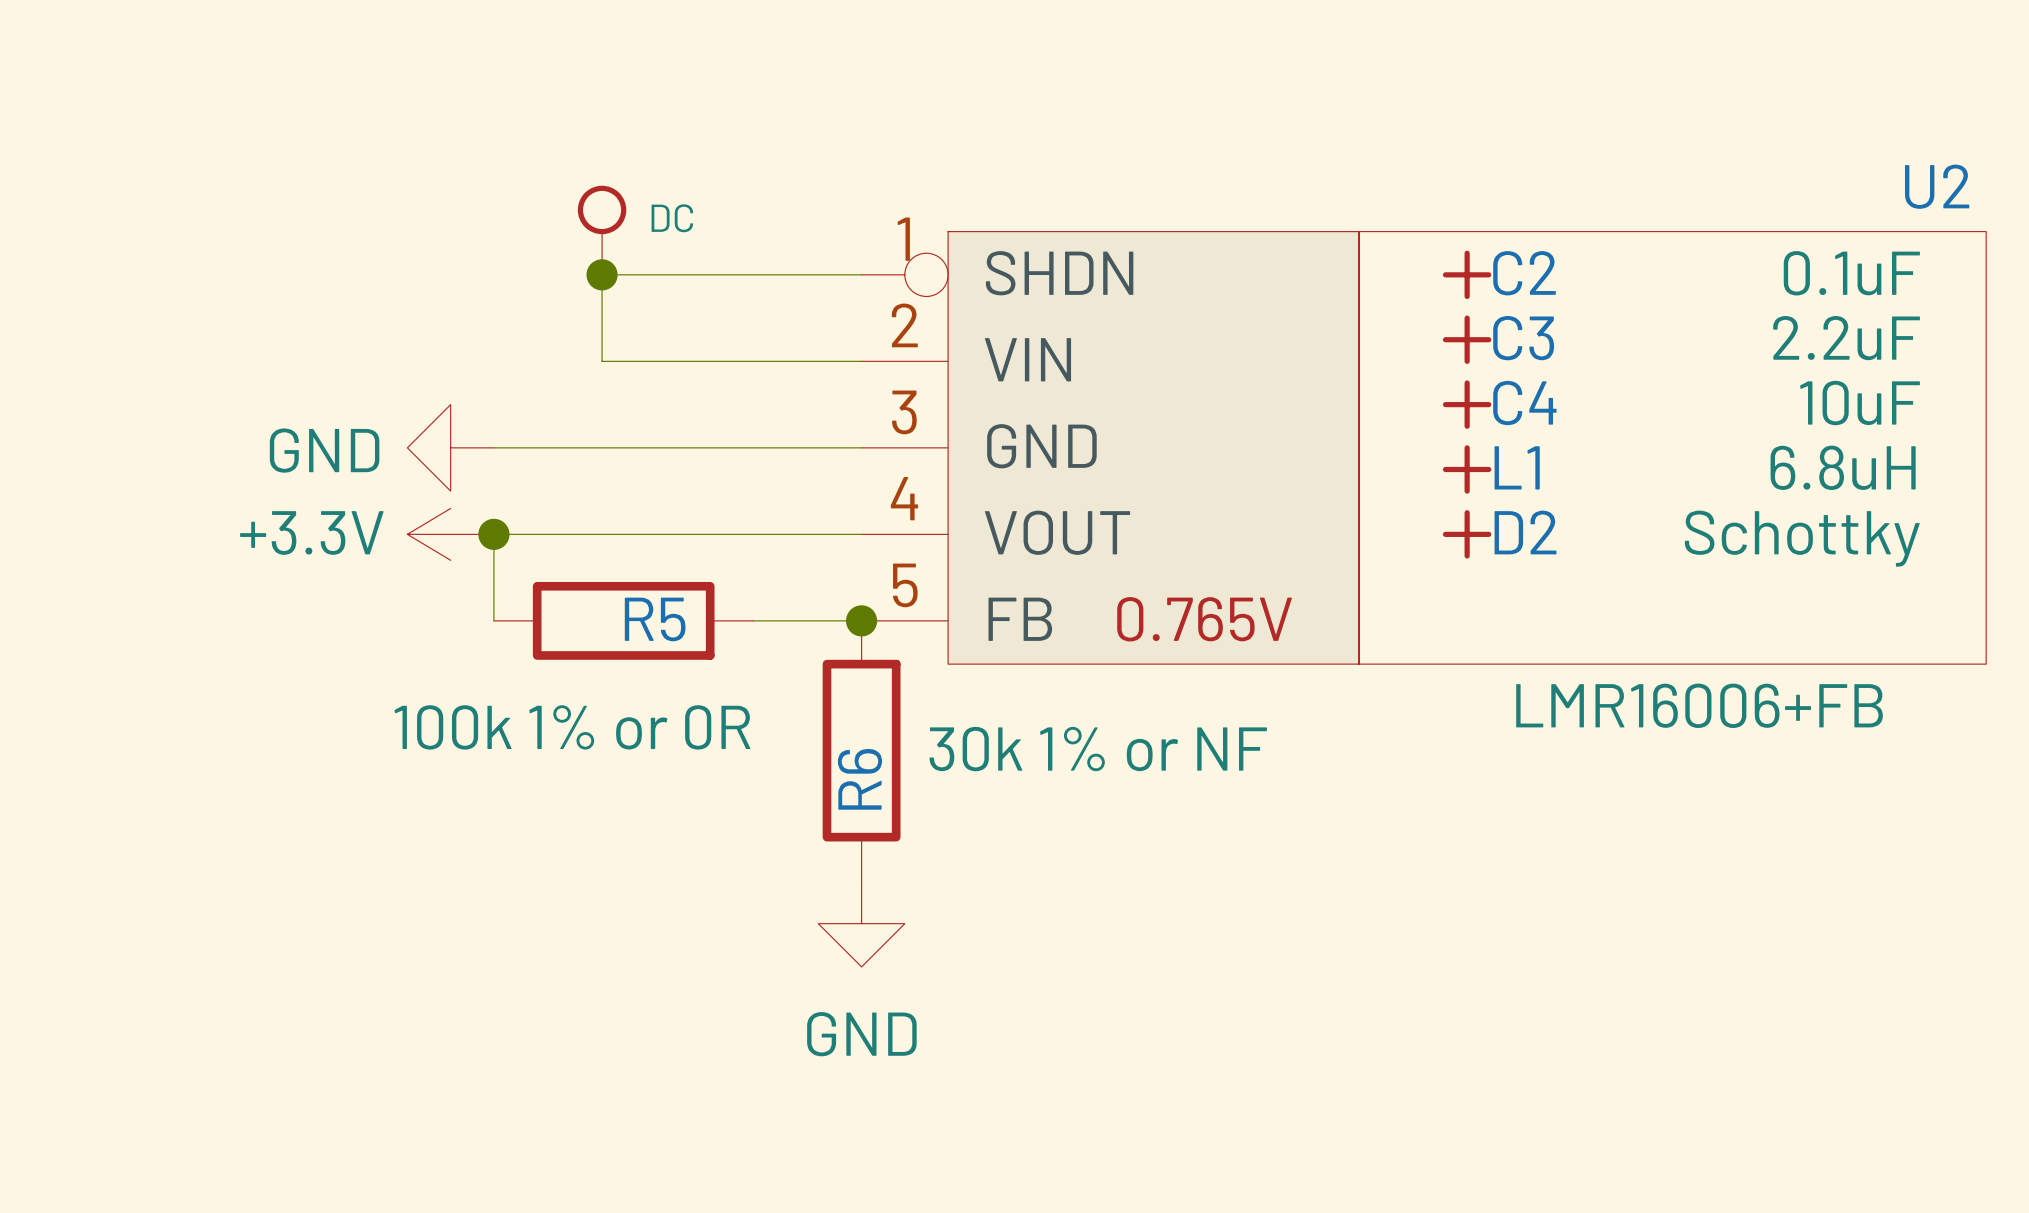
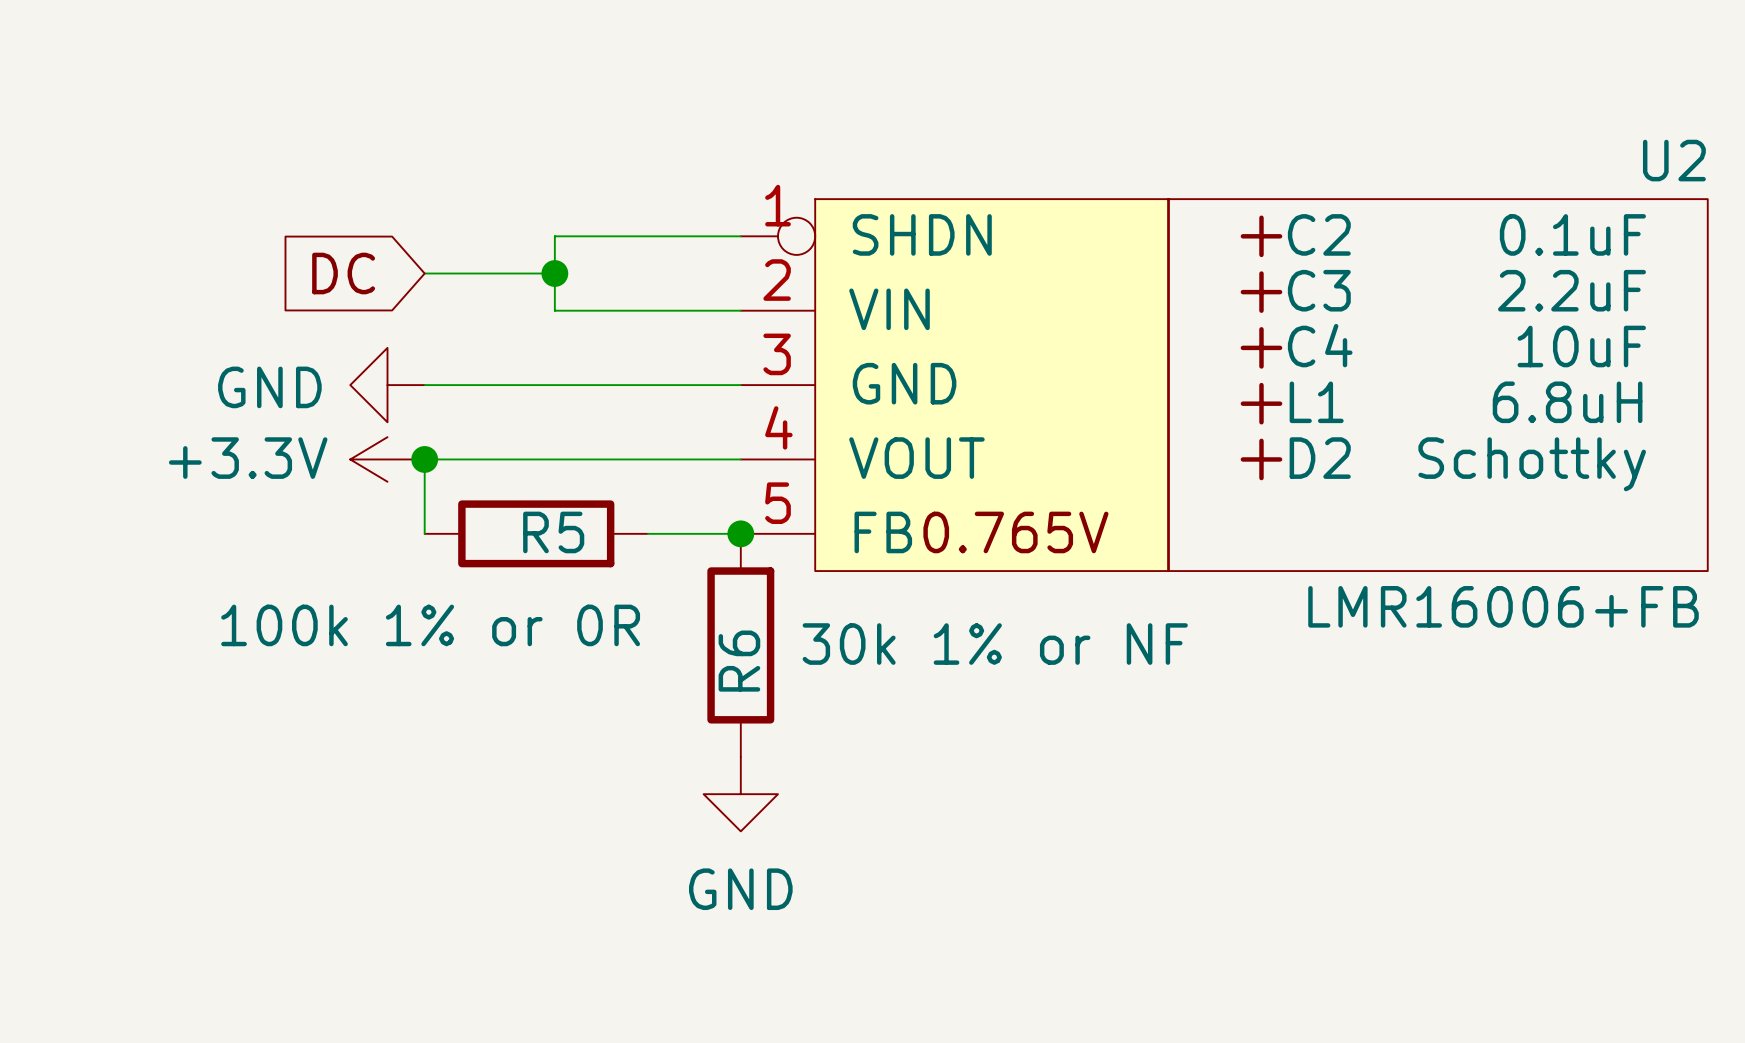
part: DC (602, 230) -> none
junction position: (602, 274) -> (554, 273)
wire: (645, 274) (602, 274) (602, 361) (645, 361) -> (554, 236) (554, 310)
global label: none -> DC (343, 273)
wire: none -> (424, 273) (554, 273)

